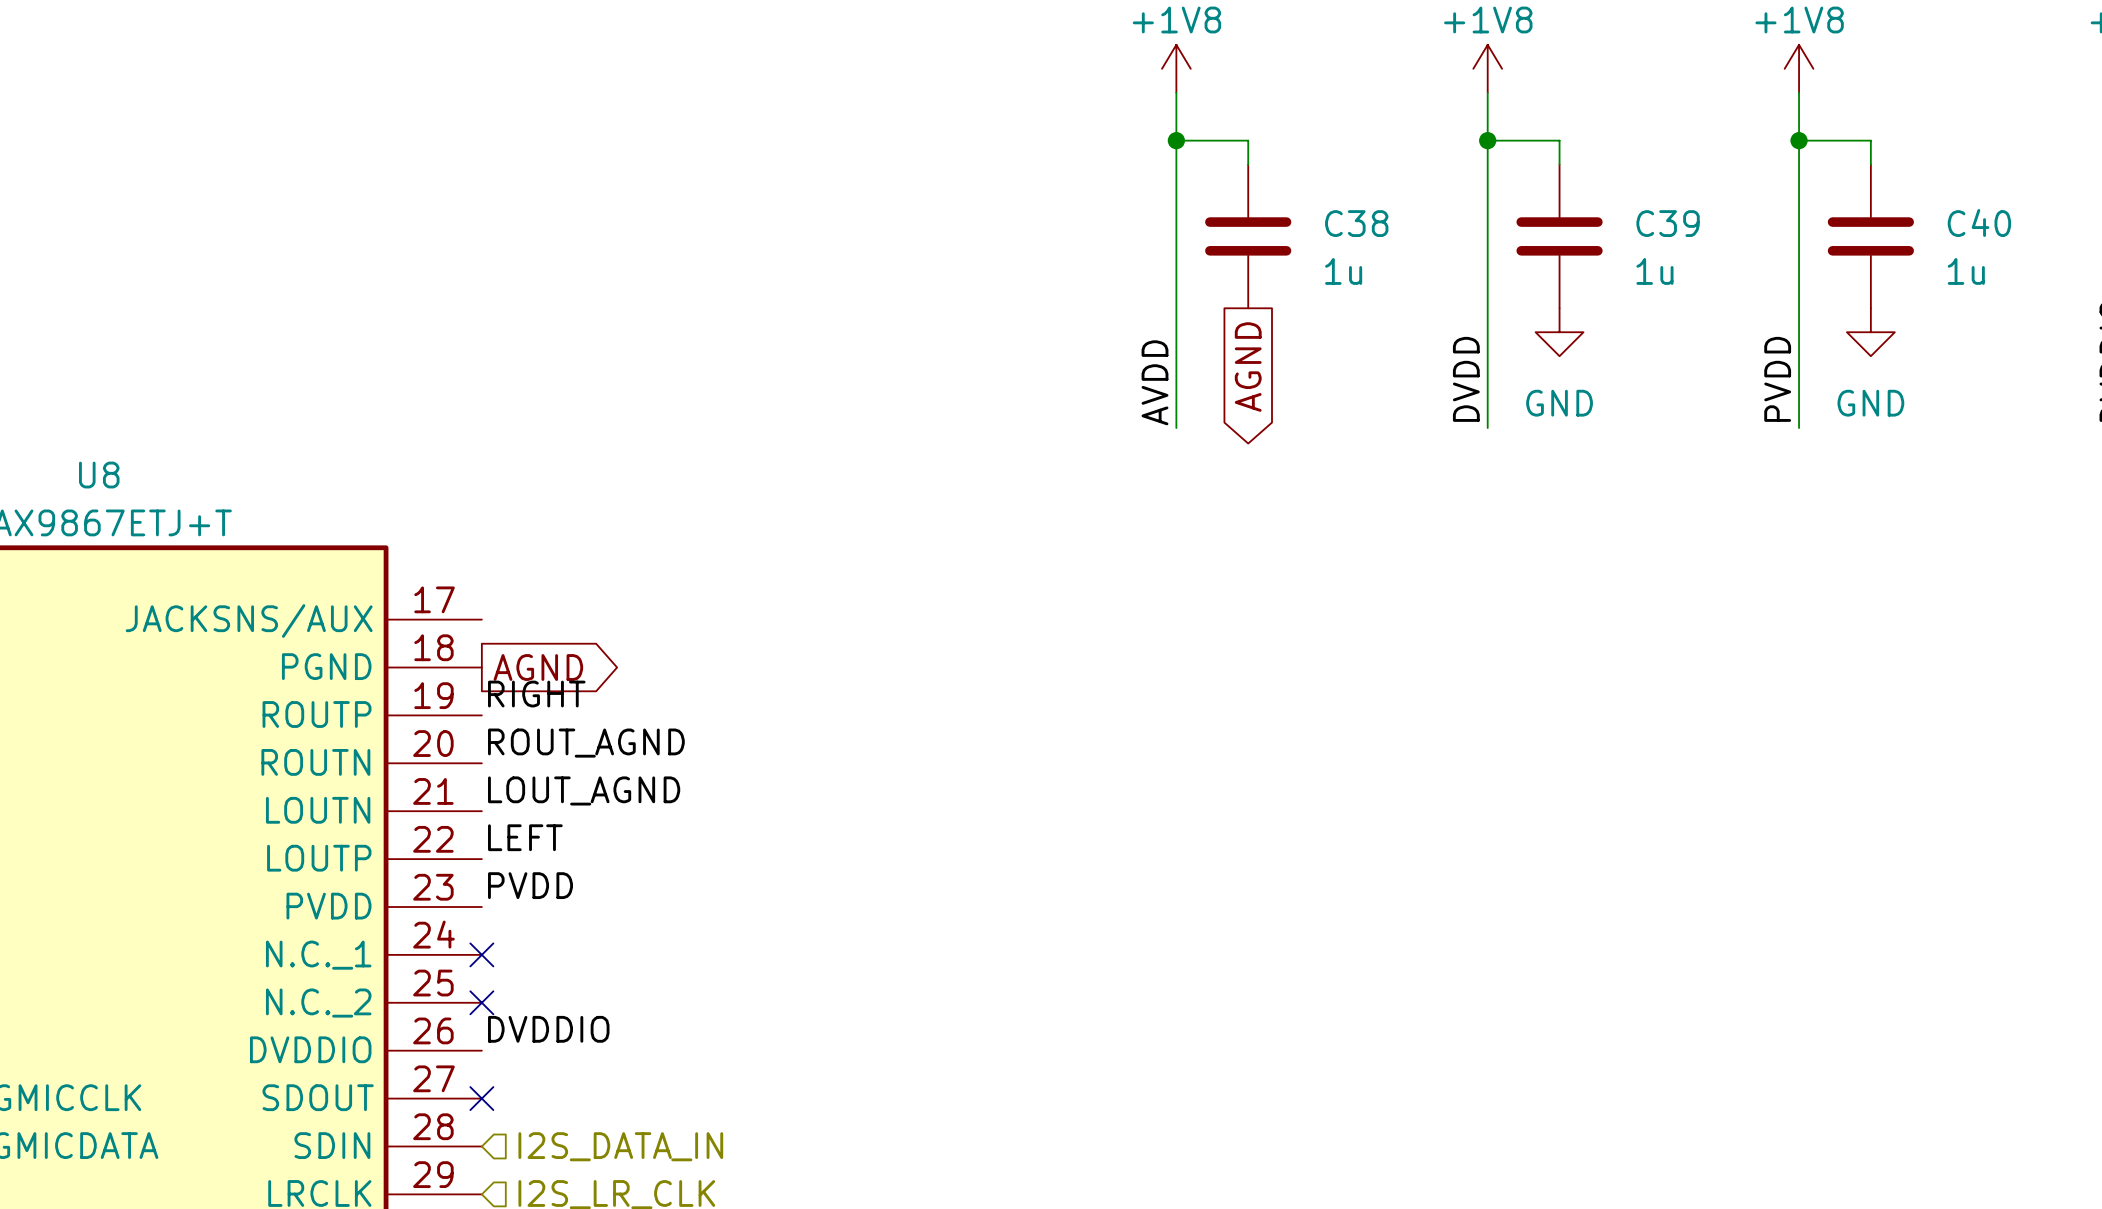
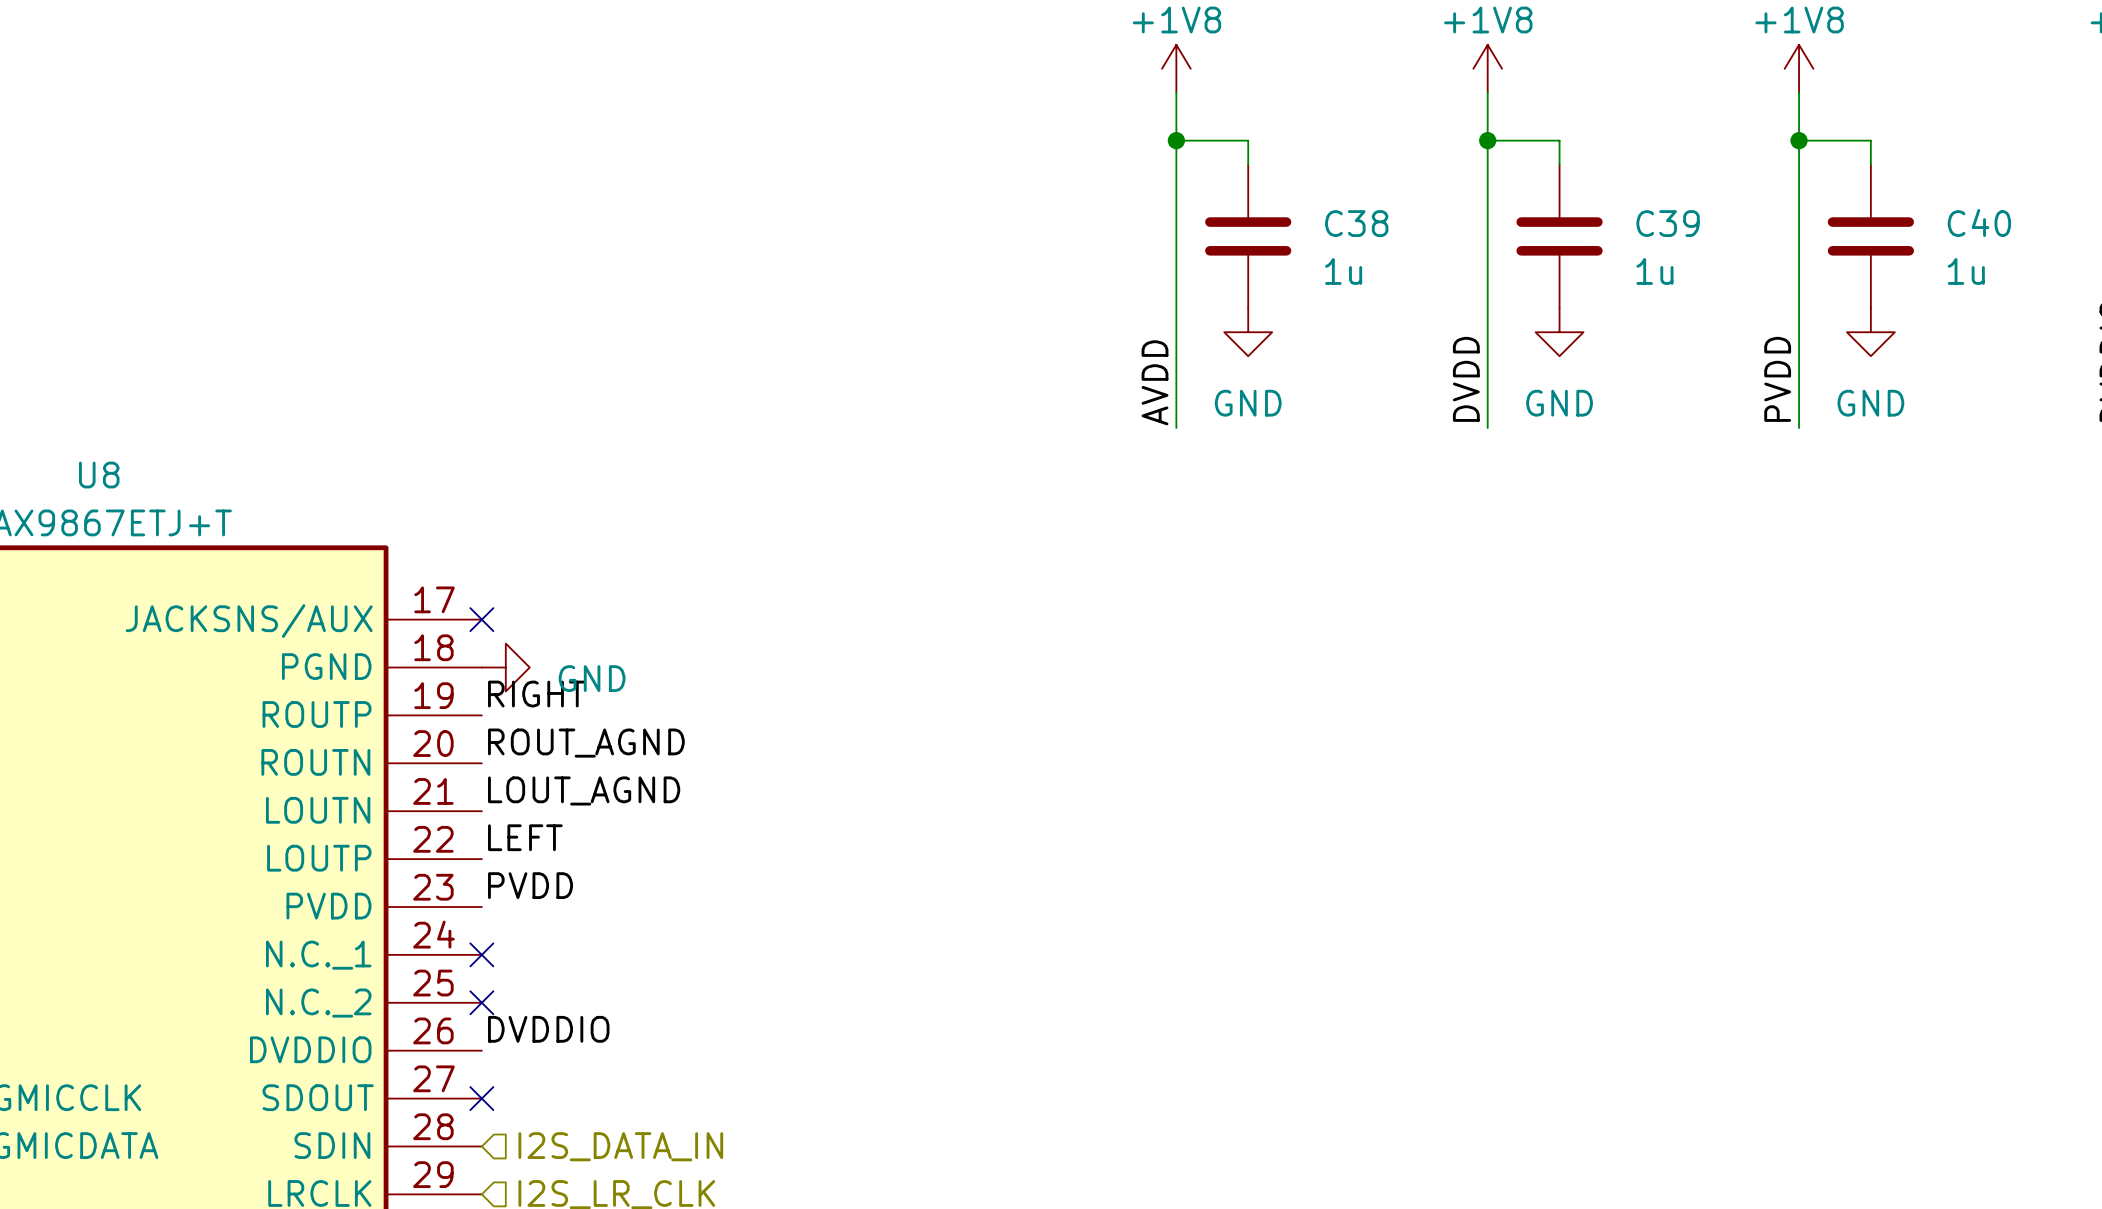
power symbol: none -> GND (1248, 332)
global label: AGND (1248, 367) -> none
no-connect mark: none -> (481, 619)
power symbol: none -> GND (505, 667)
global label: AGND (538, 667) -> none

